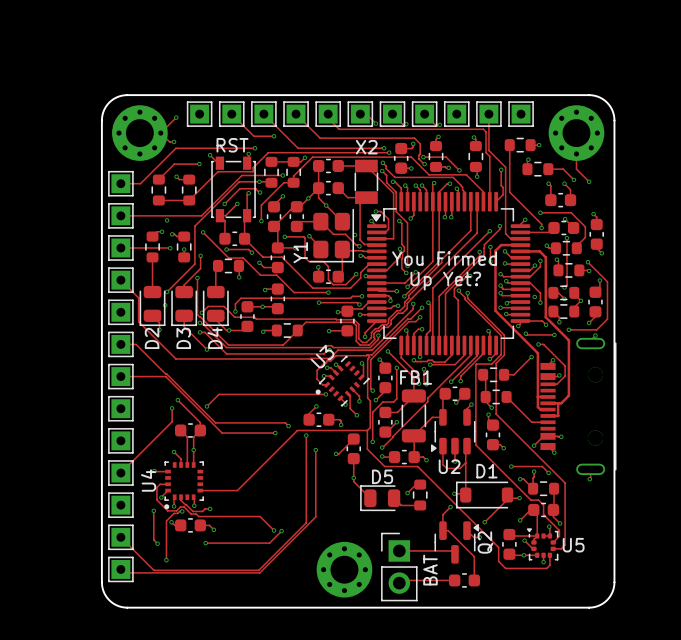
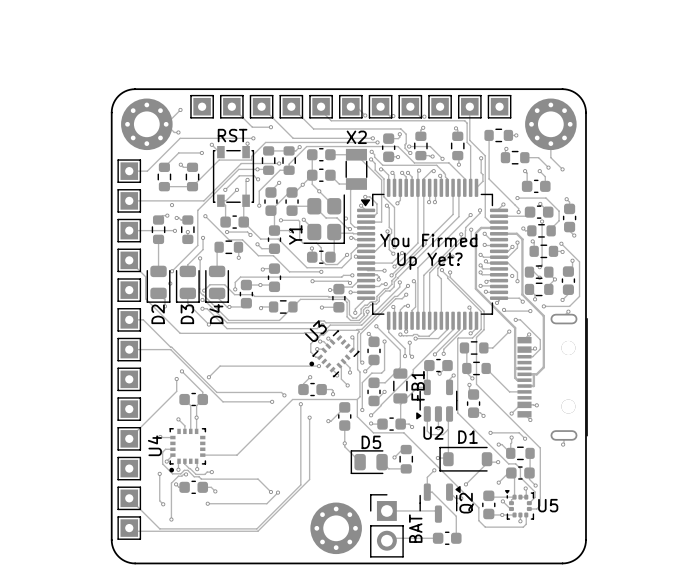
FB1 name rotation: 0° (416, 377) -> 90° counterclockwise (418, 385)
FB1 name position: FB1 (416, 377) -> FB1 (418, 385)
FB1 footprint: [401, 389, 427, 443] -> [393, 368, 408, 404]

